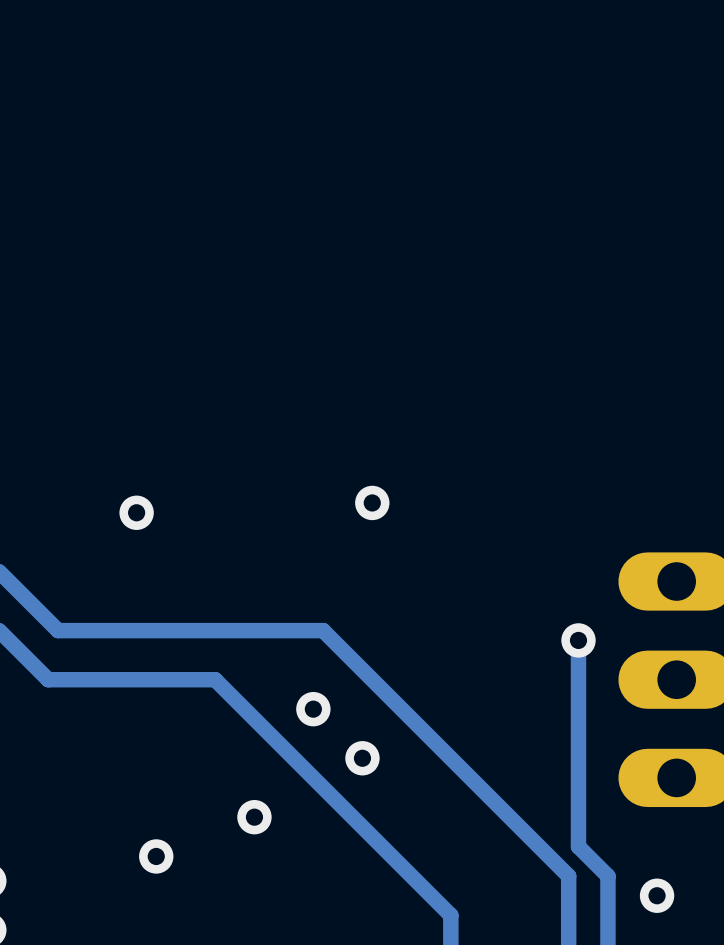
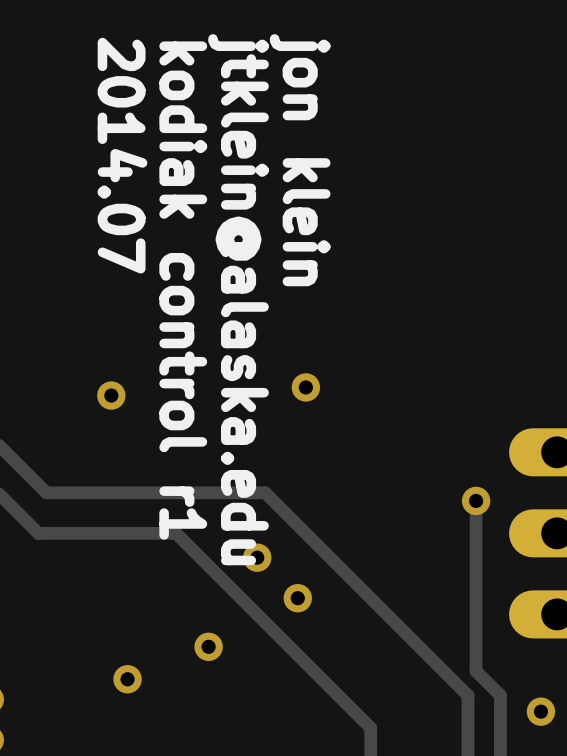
text: none -> 2014.07 (122, 155)
text: none -> jon klein (300, 160)
text: none -> kodiak control r1 (183, 290)
text: none -> jtklein@alaska.edu (238, 299)

